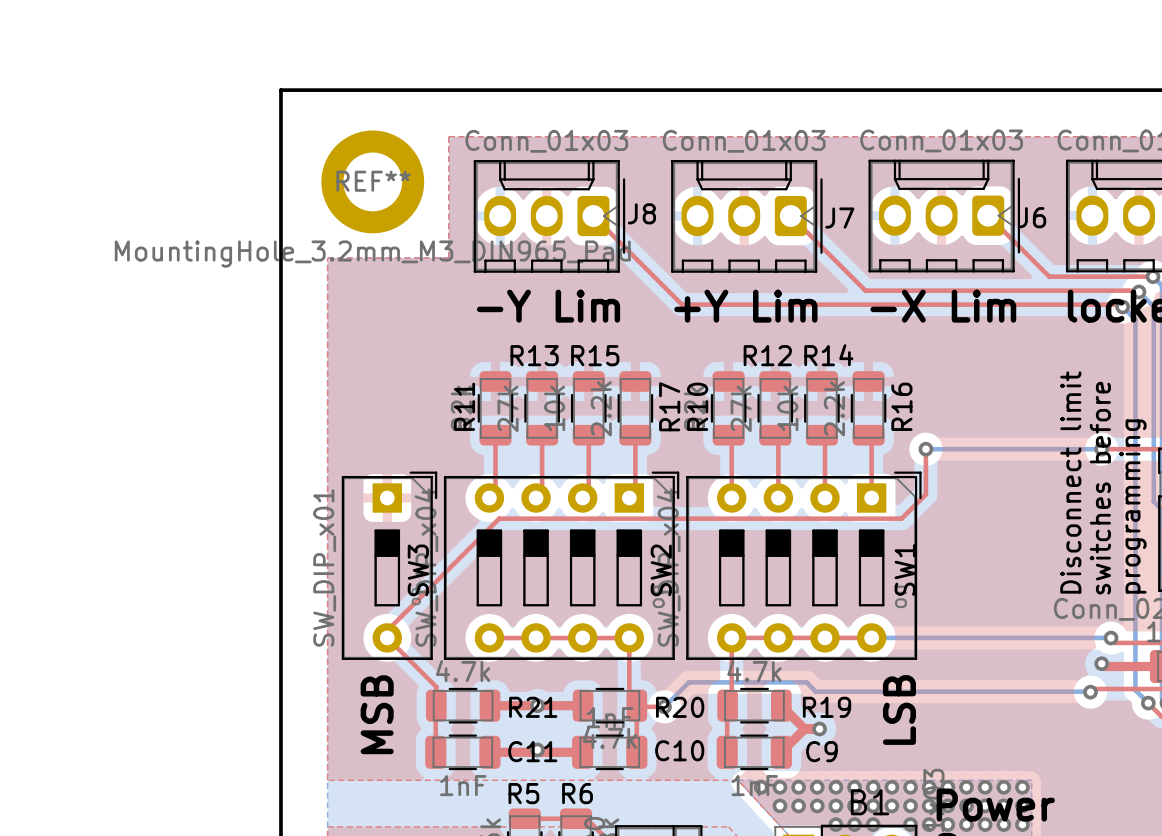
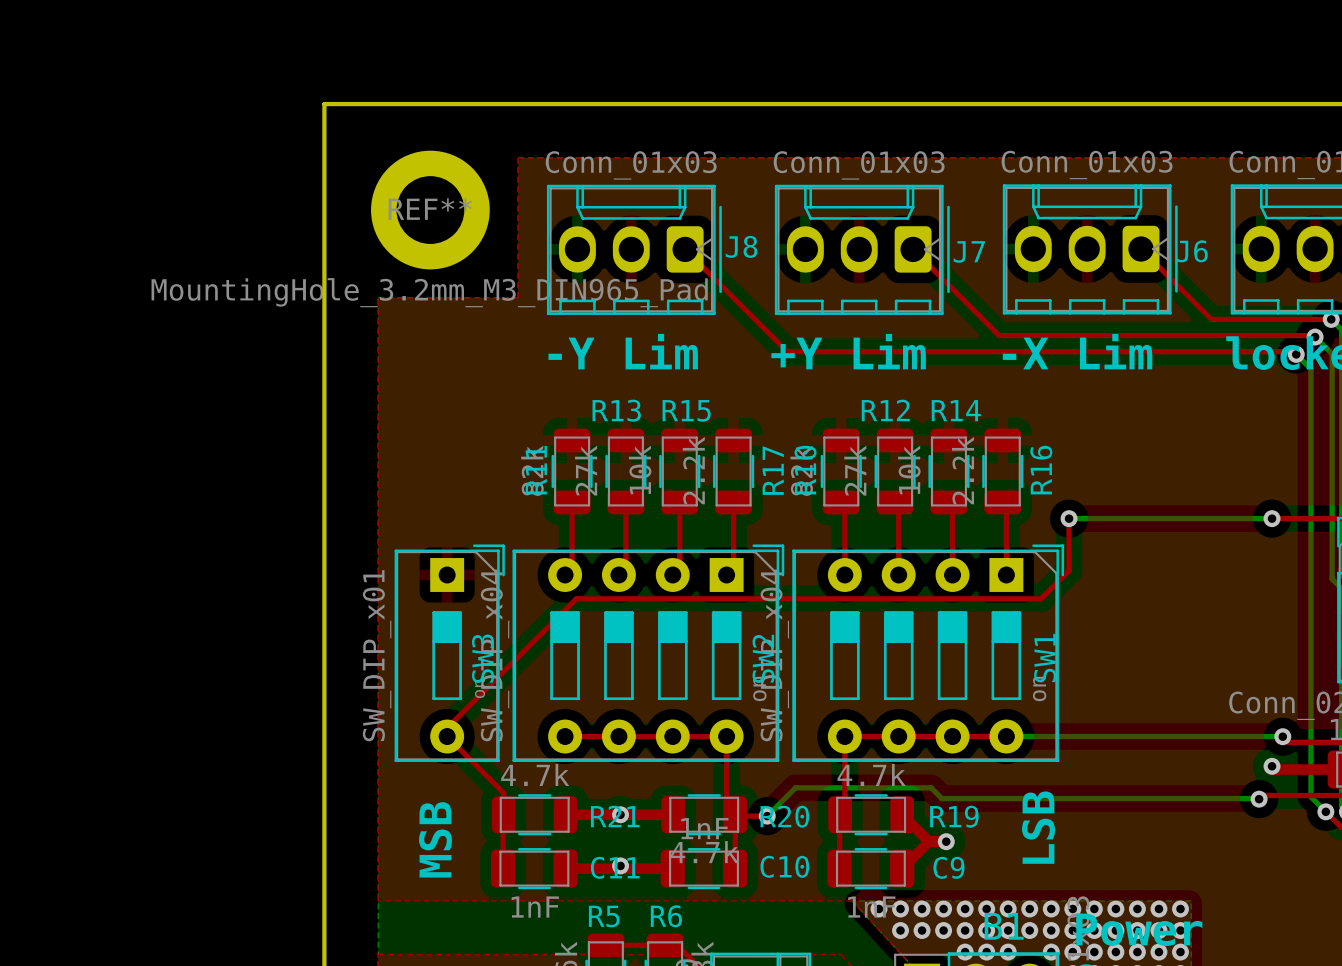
text: Disconnect limit (1070, 482) -> none
text: switches before (1100, 488) -> none
text: programming (1132, 506) -> none

